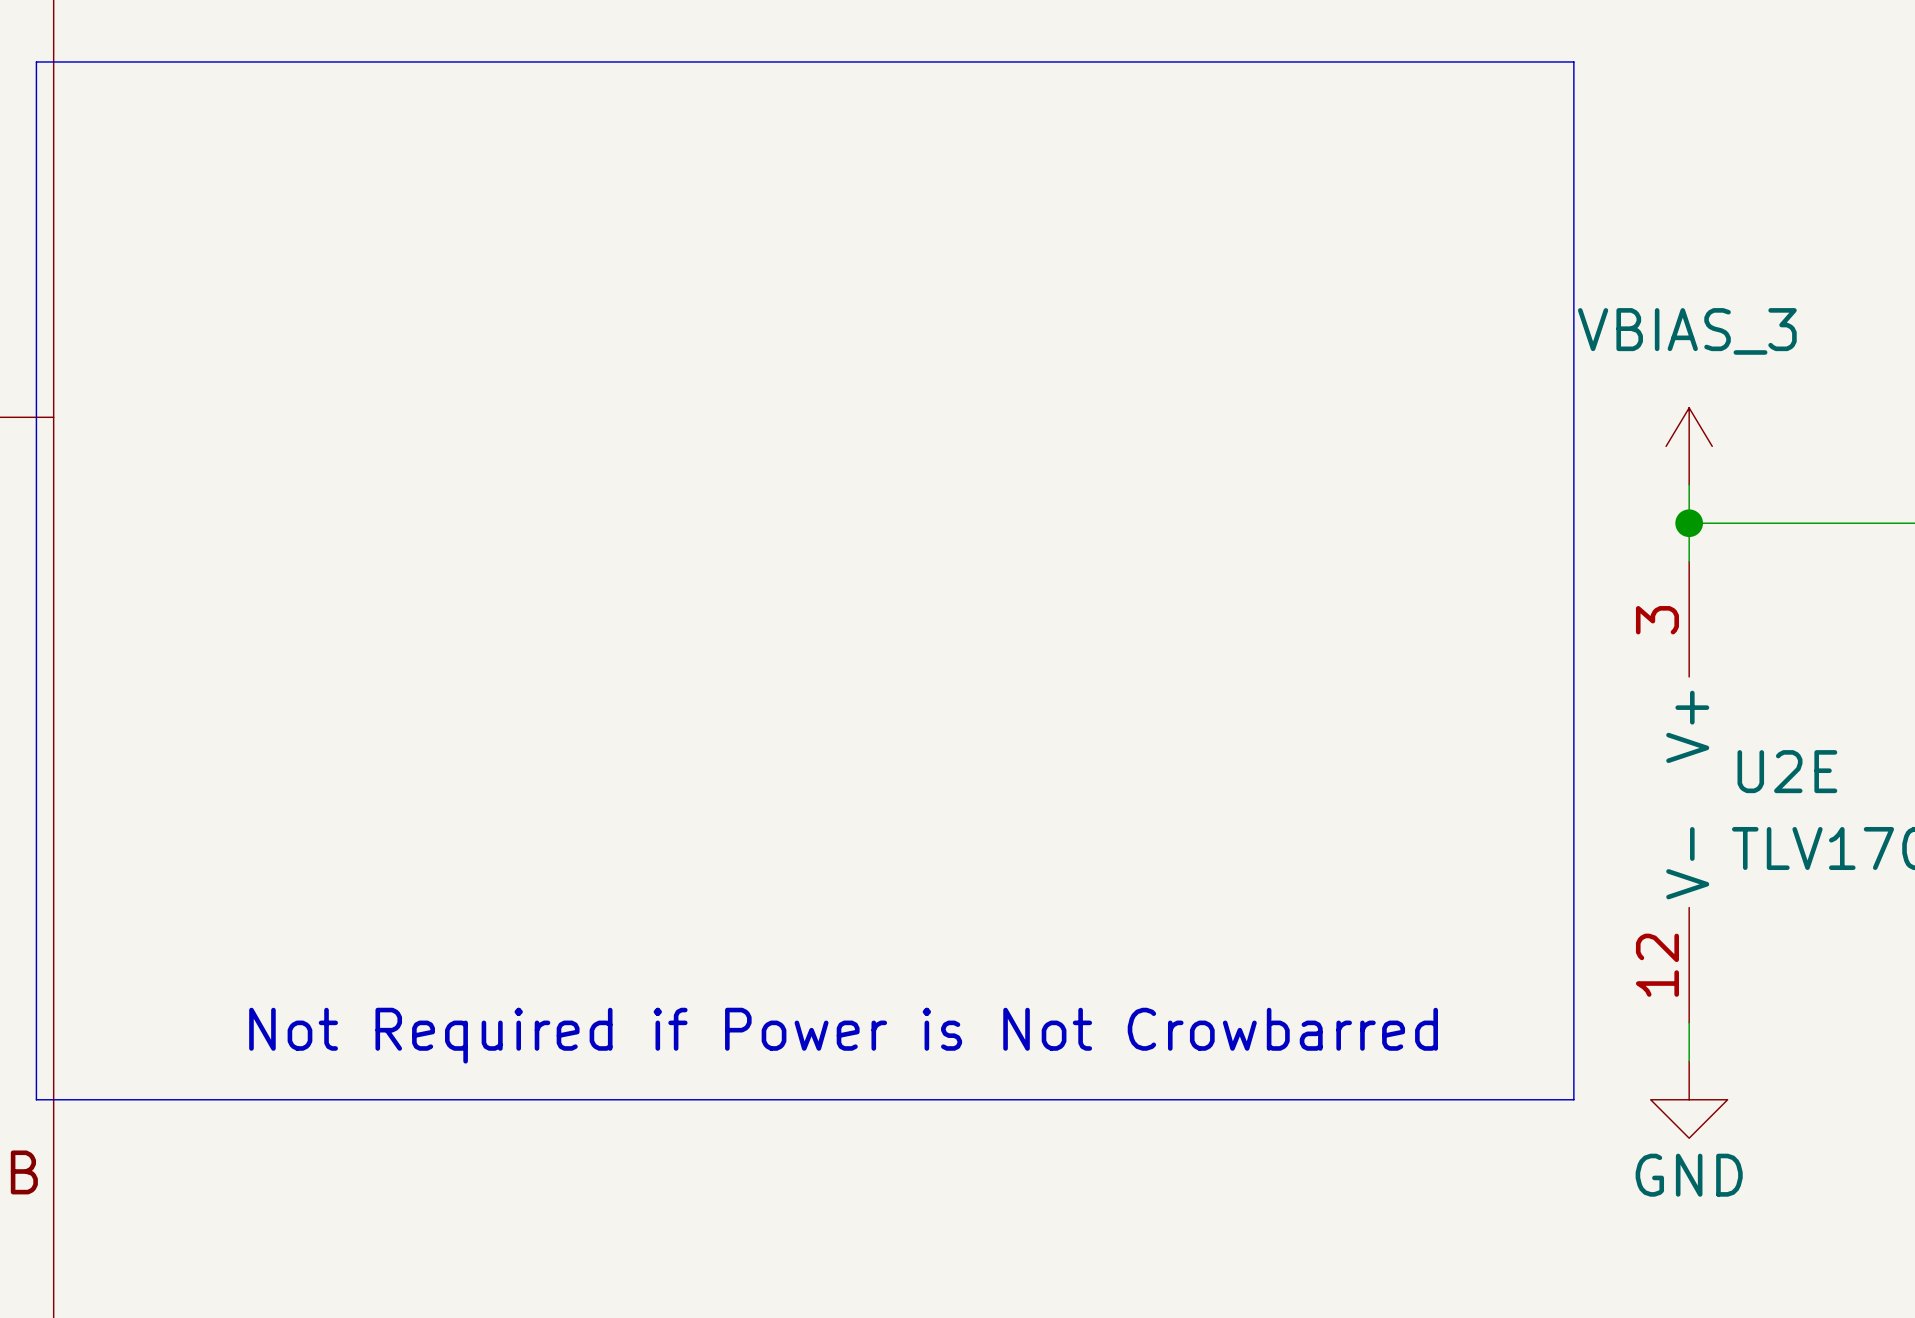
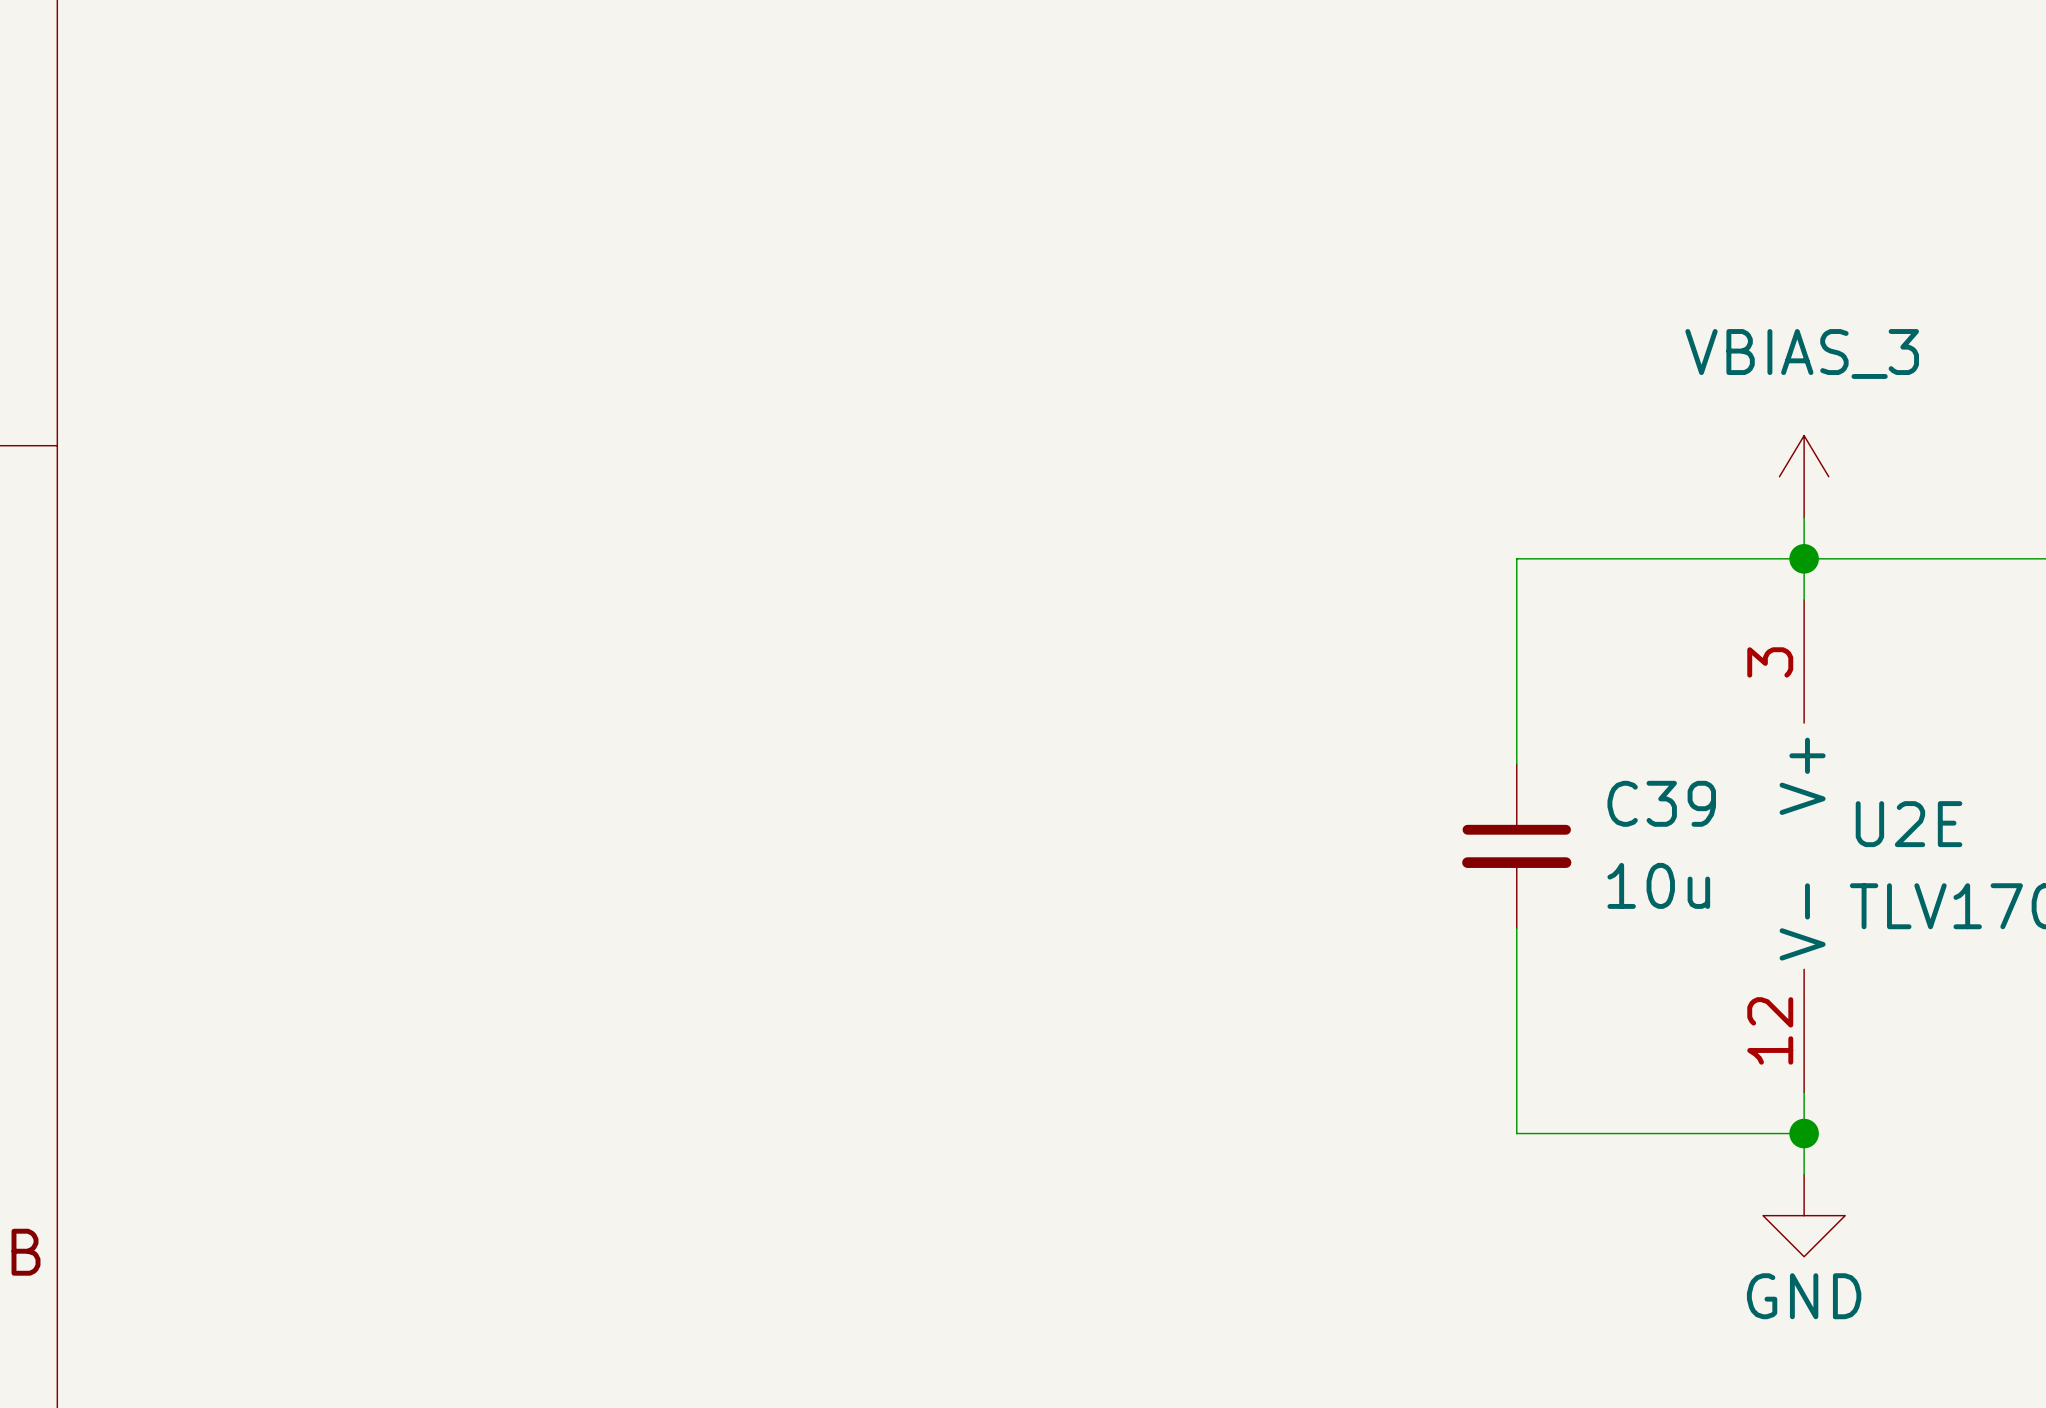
line: (36, 61) (1573, 61) (1573, 1099) (36, 1099) (36, 61) -> none
wire: none -> (1804, 558) (1516, 558) (1516, 764)
C39: none -> 10u (1516, 846)
wire: none -> (1516, 928) (1516, 1133) (1804, 1133) (1804, 1174)
text: Not Required if Power is Not Crowbarred (843, 1035) -> none
junction: none -> (1804, 1133)
power symbol position: GND (1689, 1099) -> GND (1804, 1215)

